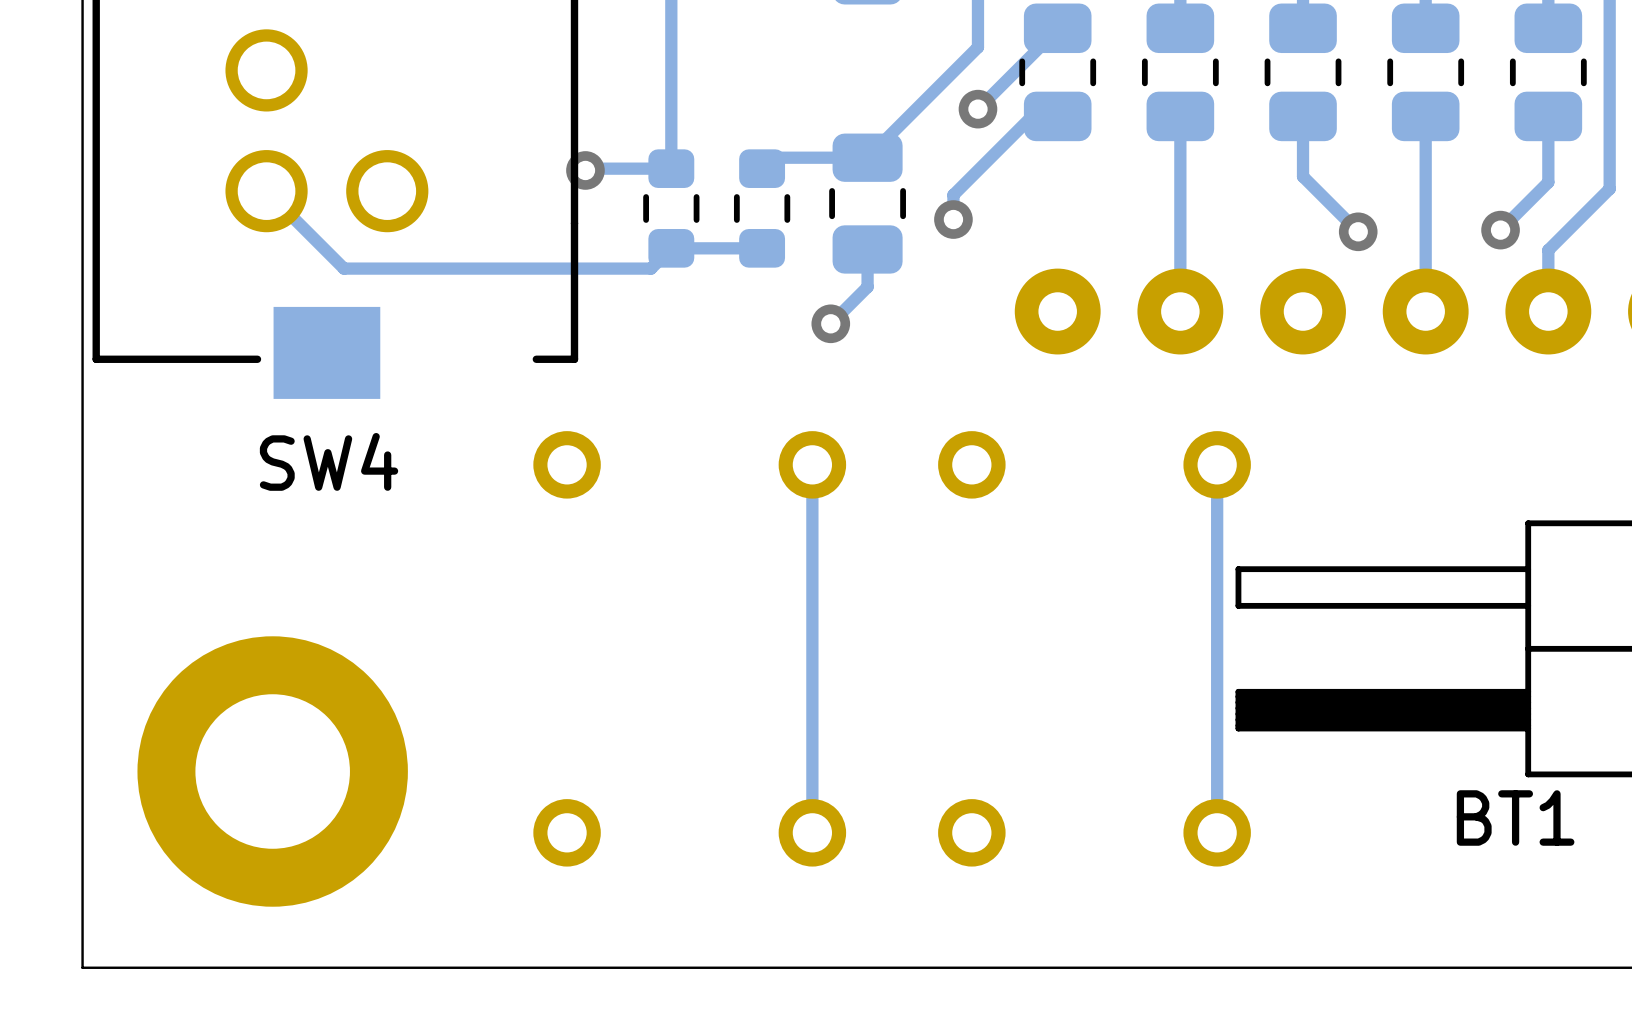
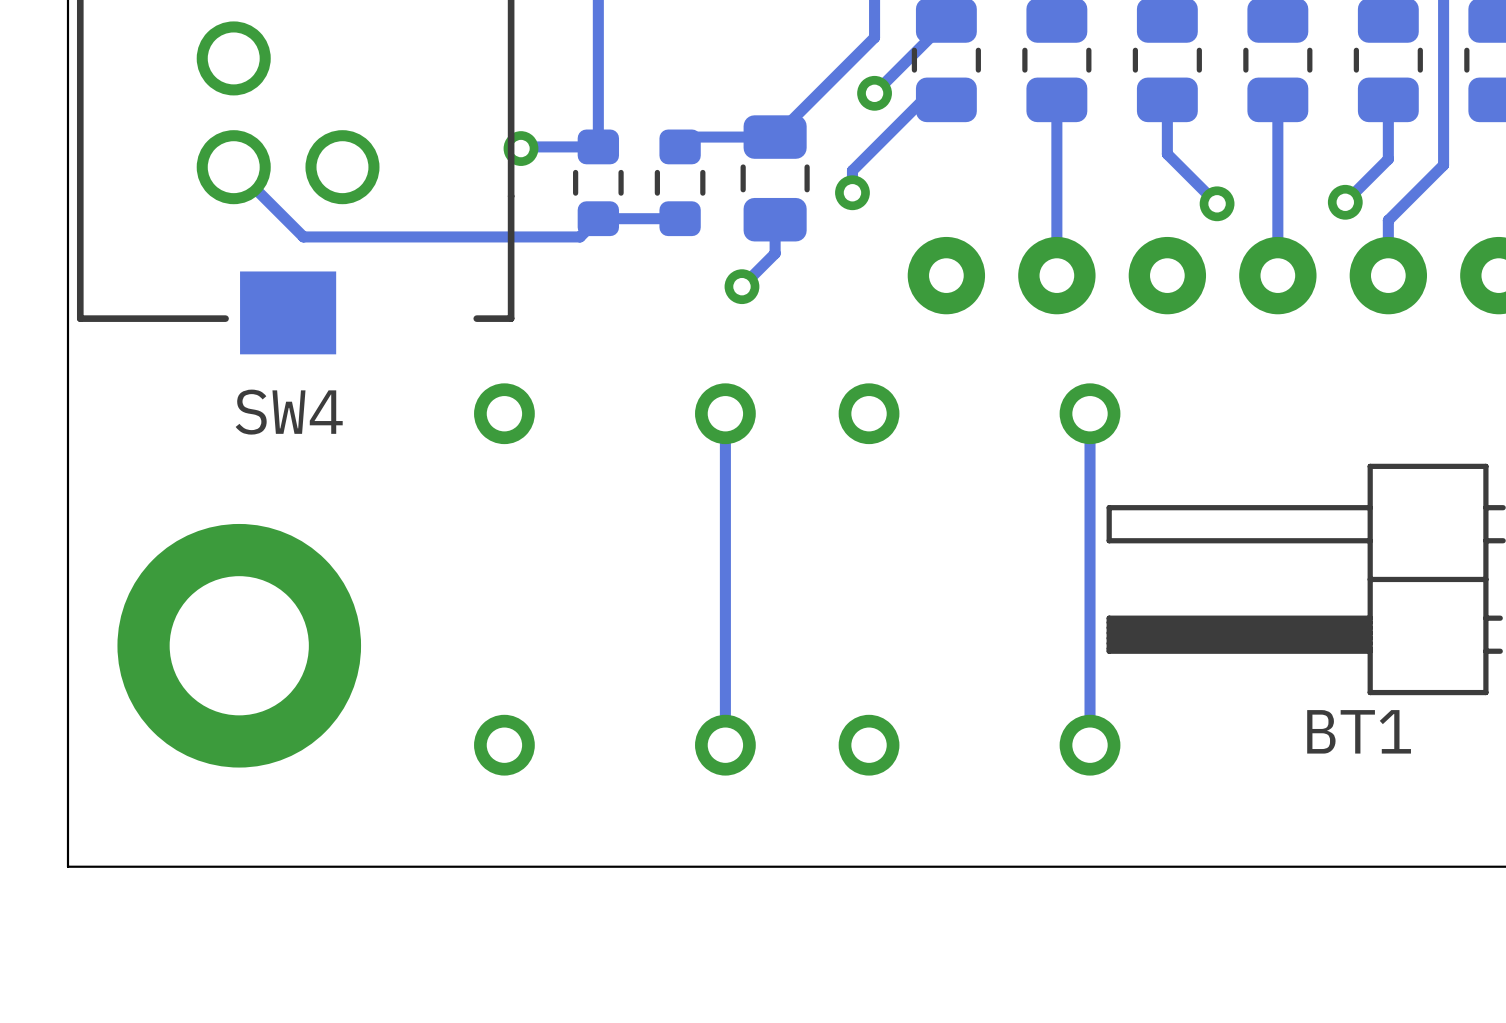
part position: (272, 771) -> (239, 645)

